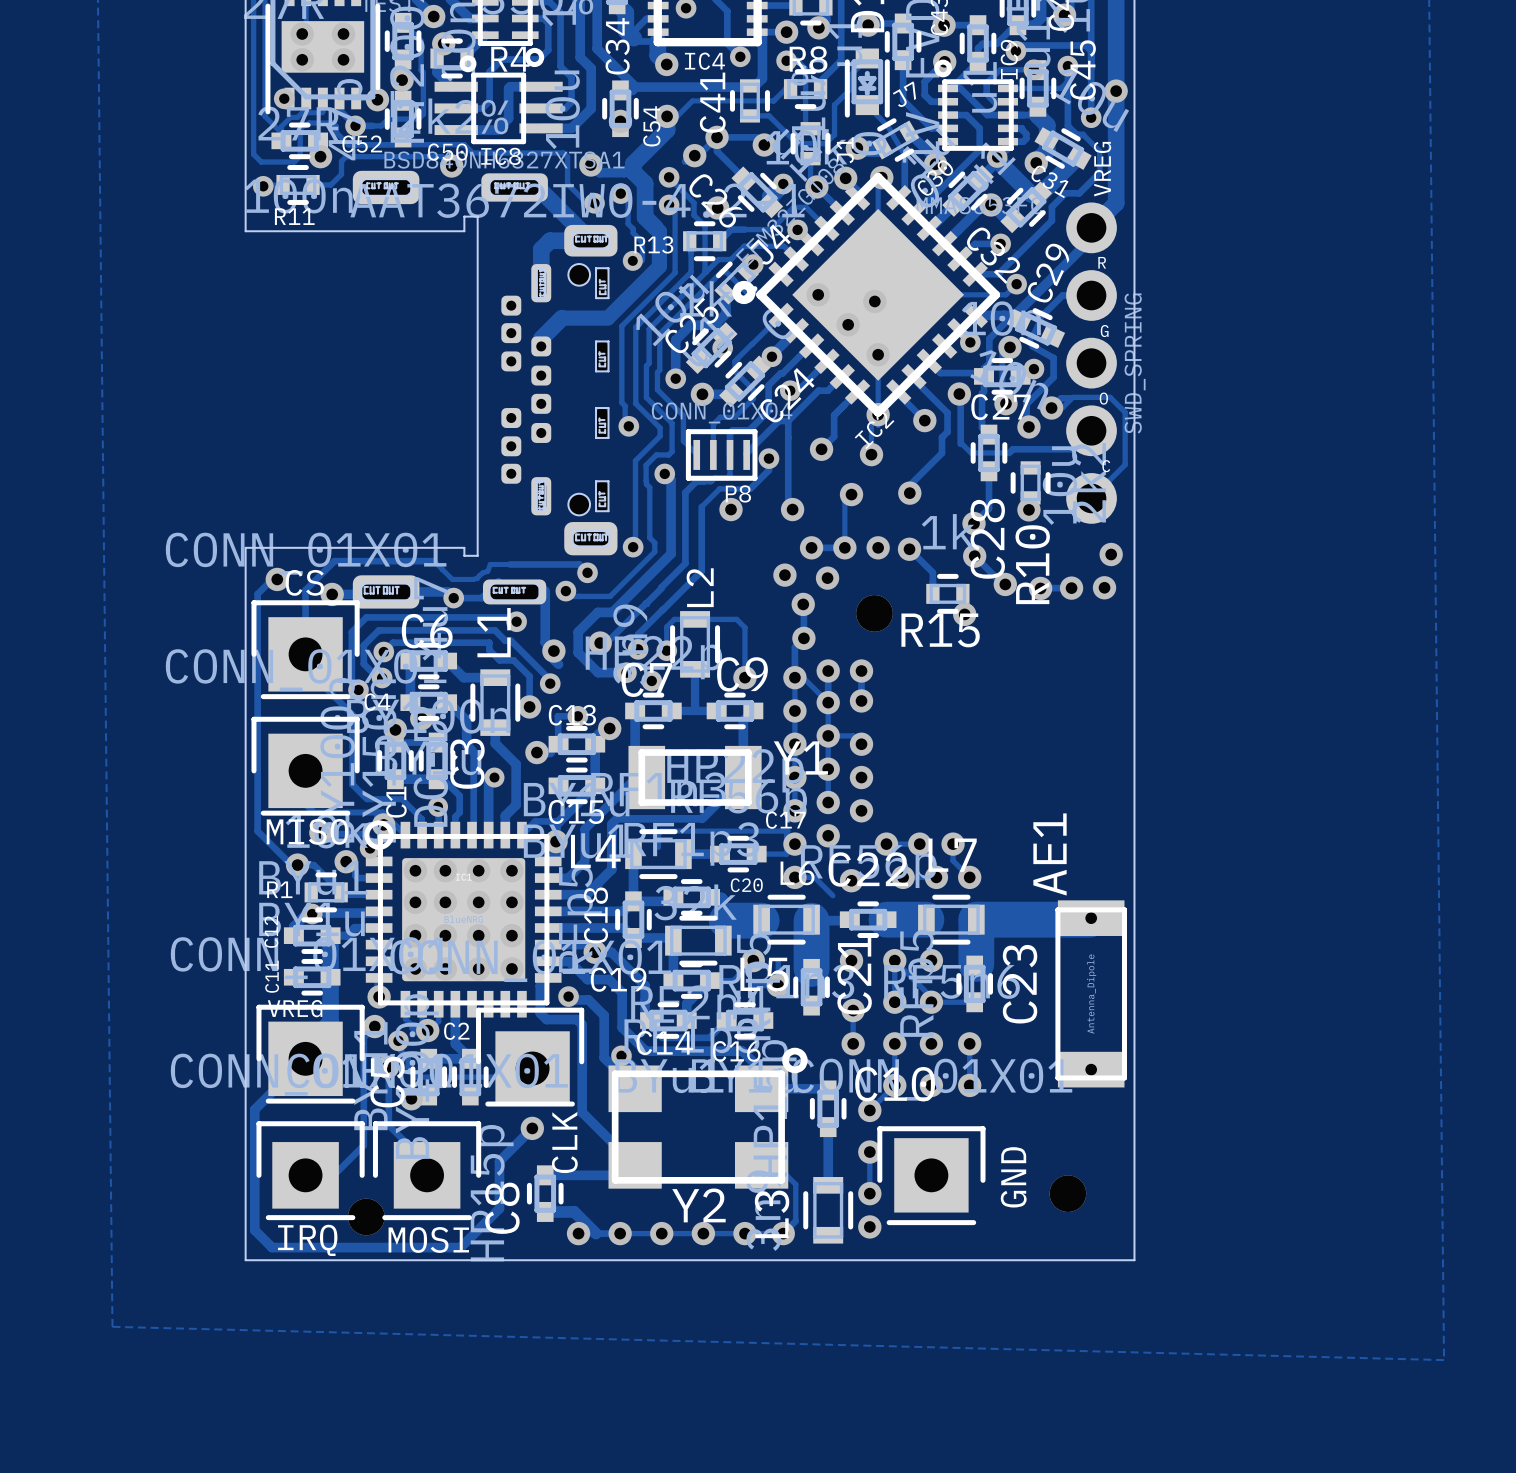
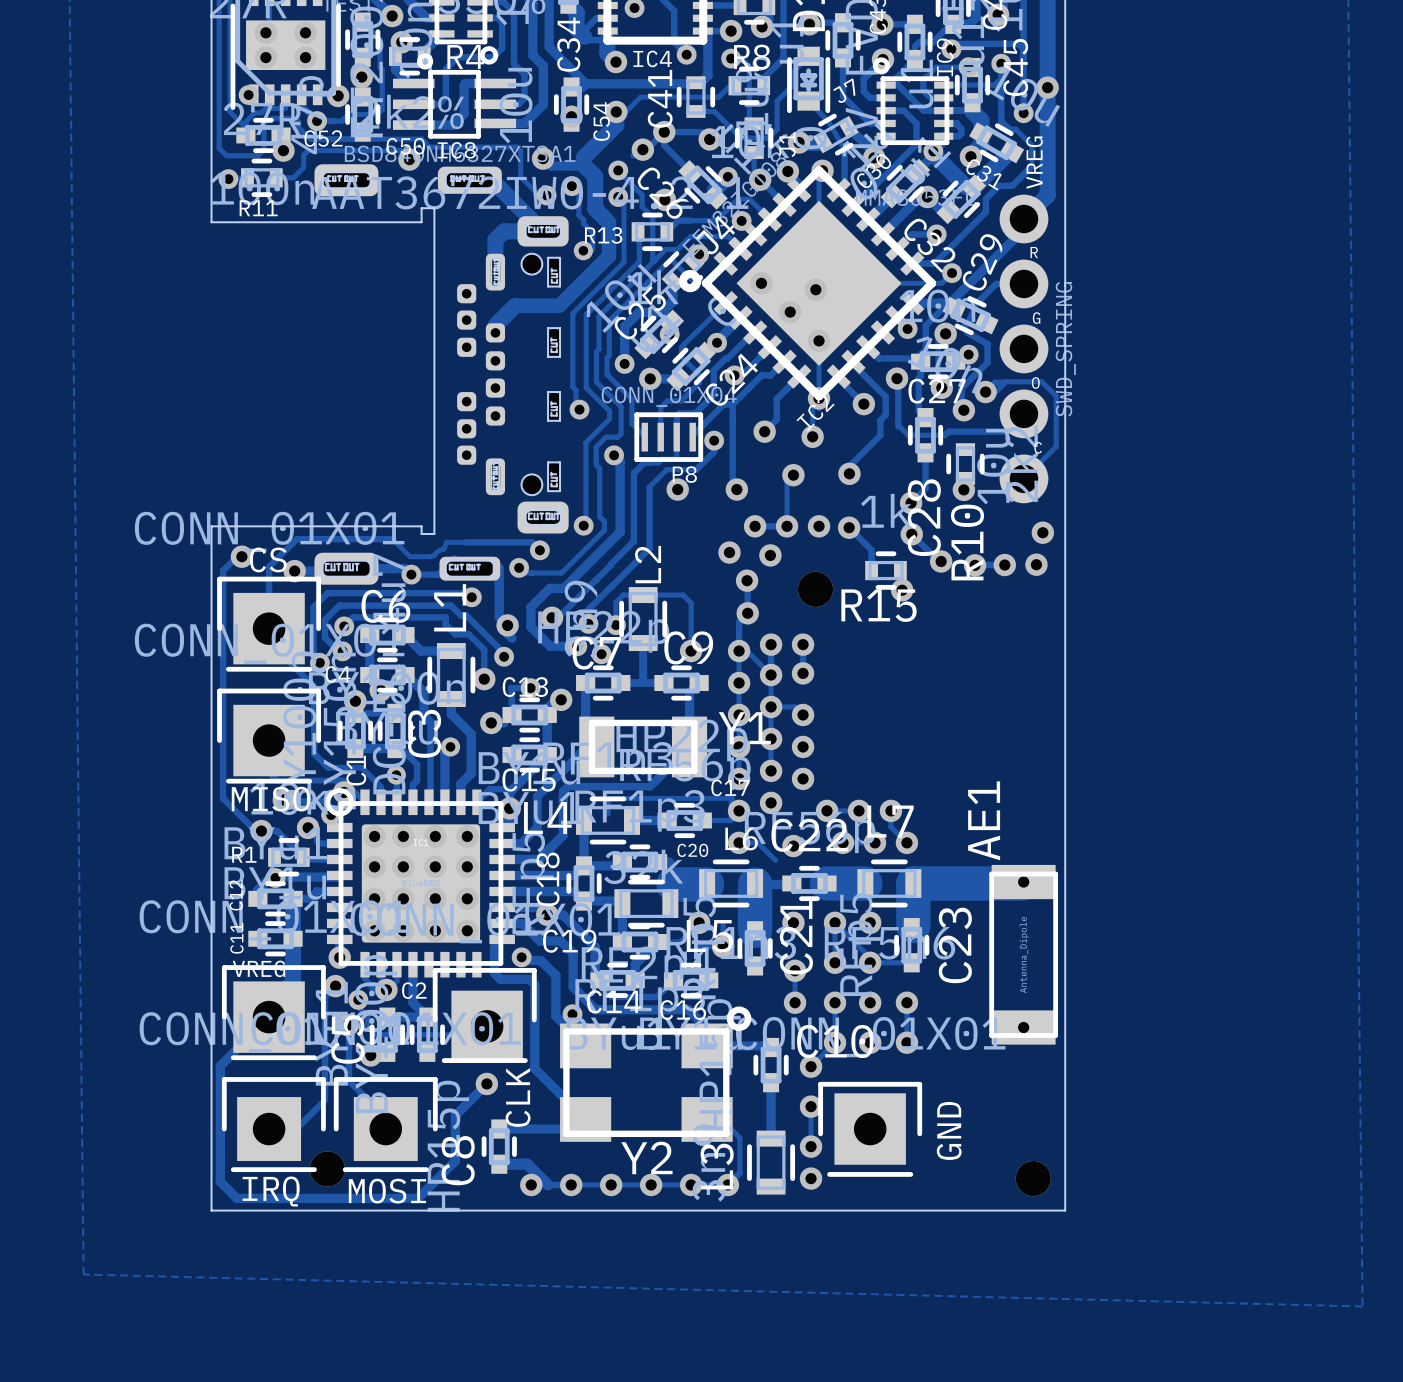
part position: (1067, 1193) -> (1033, 1178)

